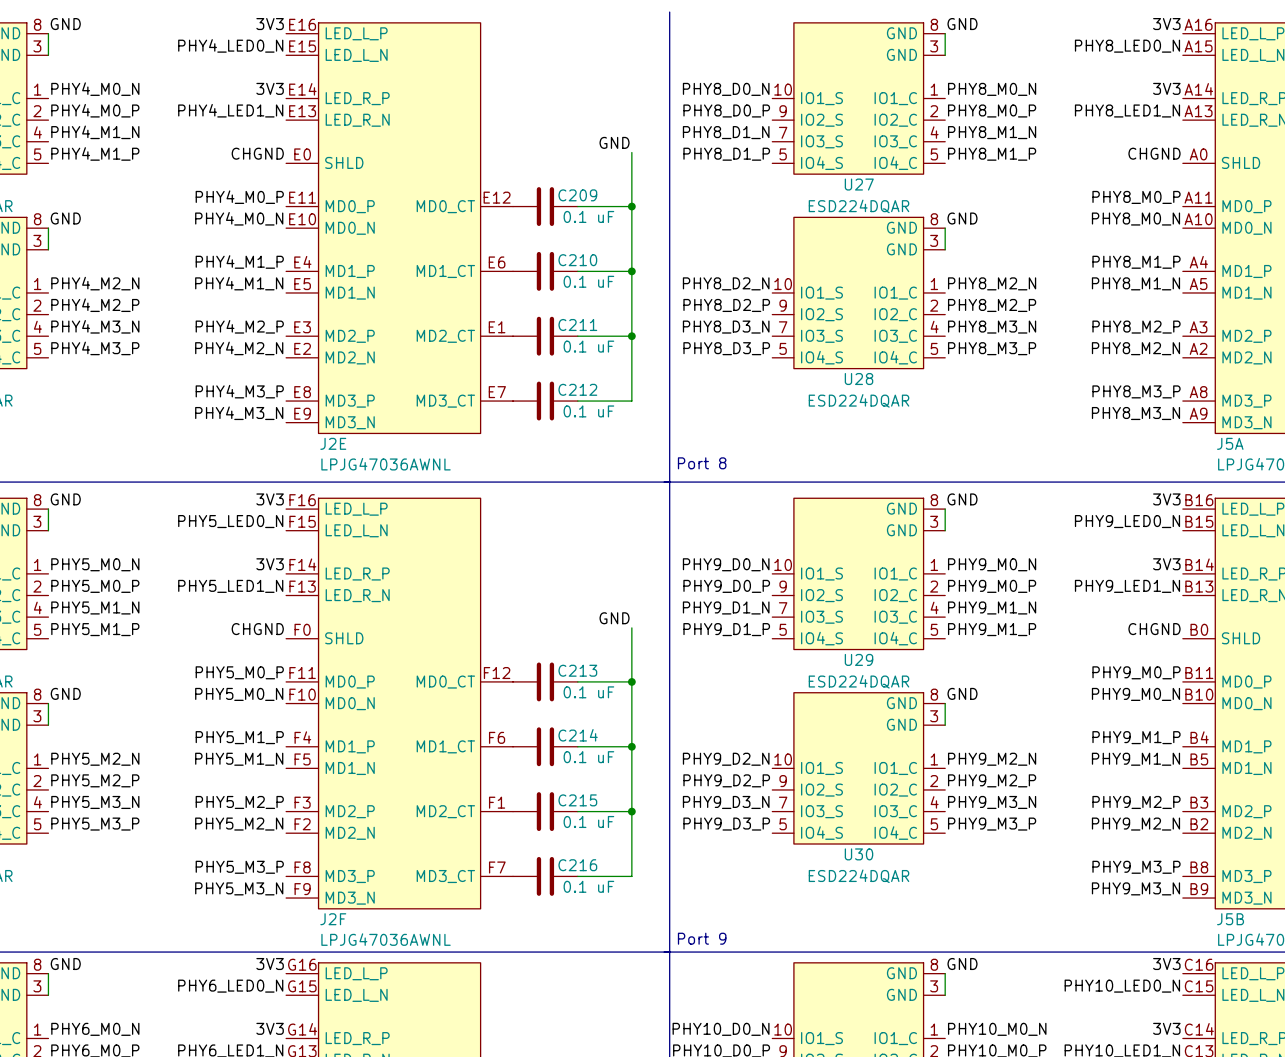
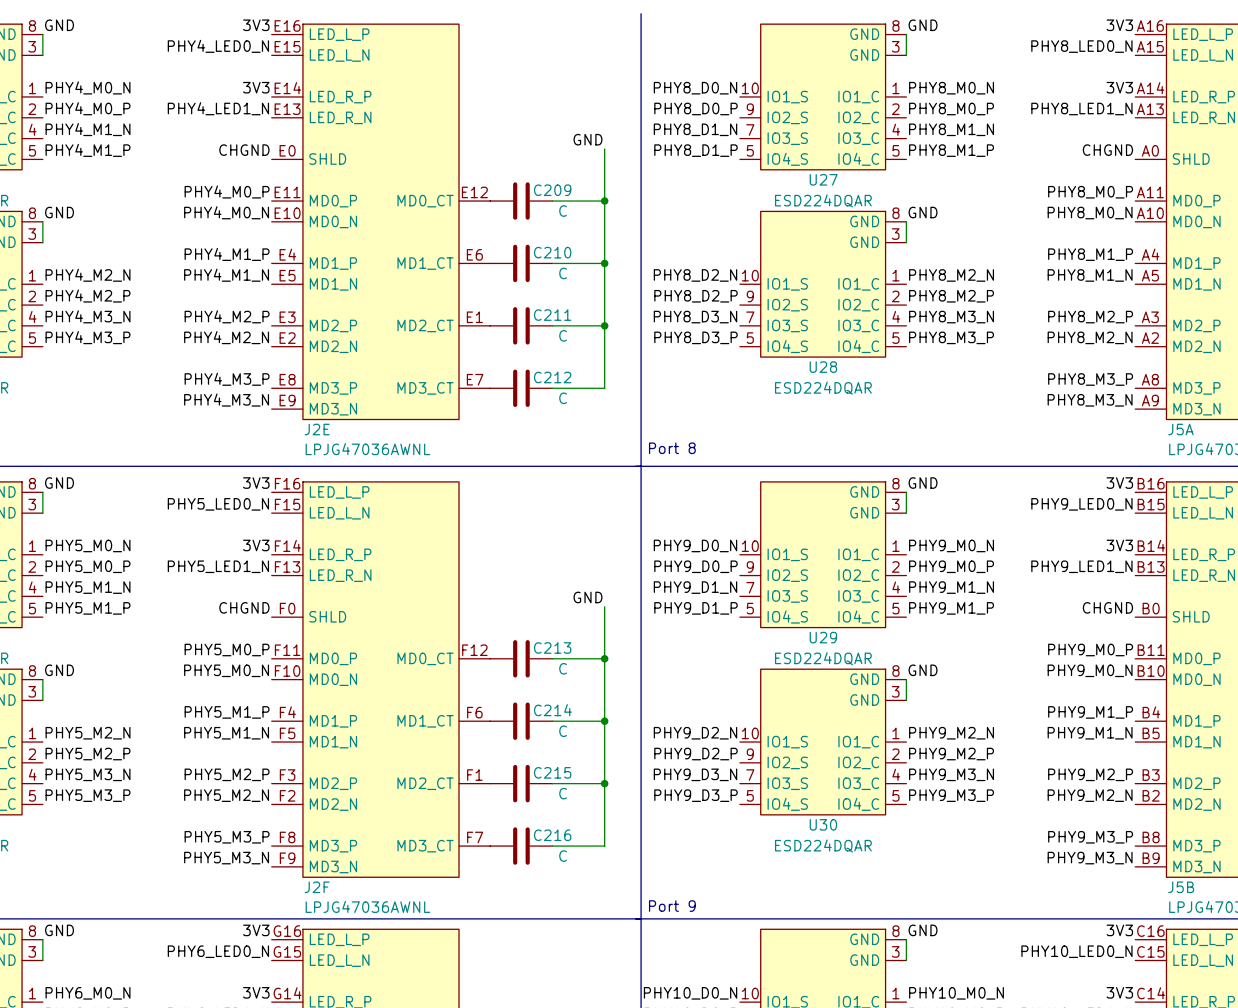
C209 value: 0.1 uF (588, 216) -> C (563, 211)
C210 value: 0.1 uF (588, 281) -> C (563, 273)
C211 value: 0.1 uF (588, 346) -> C (563, 335)
C212 value: 0.1 uF (588, 411) -> C (563, 398)
C213 value: 0.1 uF (588, 692) -> C (563, 668)
C214 value: 0.1 uF (588, 757) -> C (563, 731)
C215 value: 0.1 uF (588, 821) -> C (563, 793)
C216 value: 0.1 uF (588, 886) -> C (563, 856)

